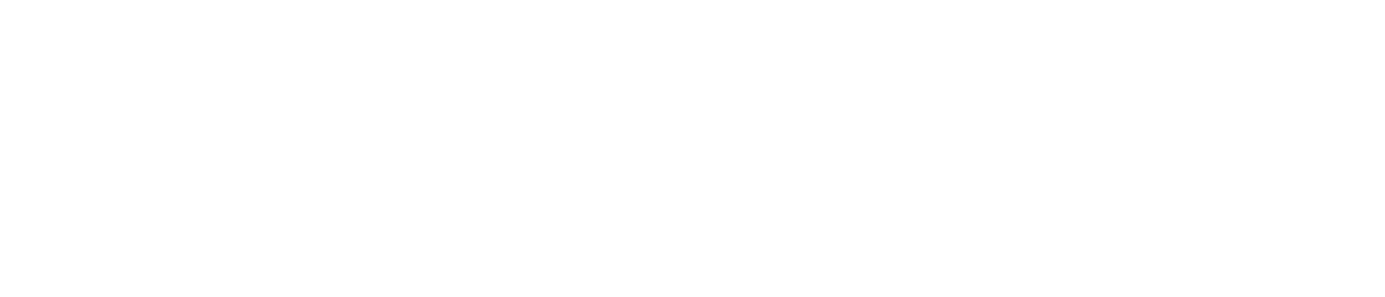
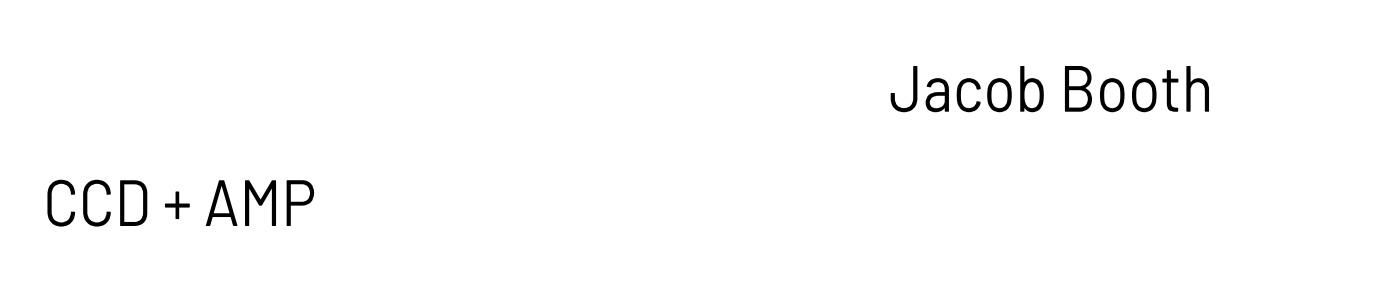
text: none -> Jacob Booth (1049, 89)
text: none -> CCD + AMP (180, 203)

